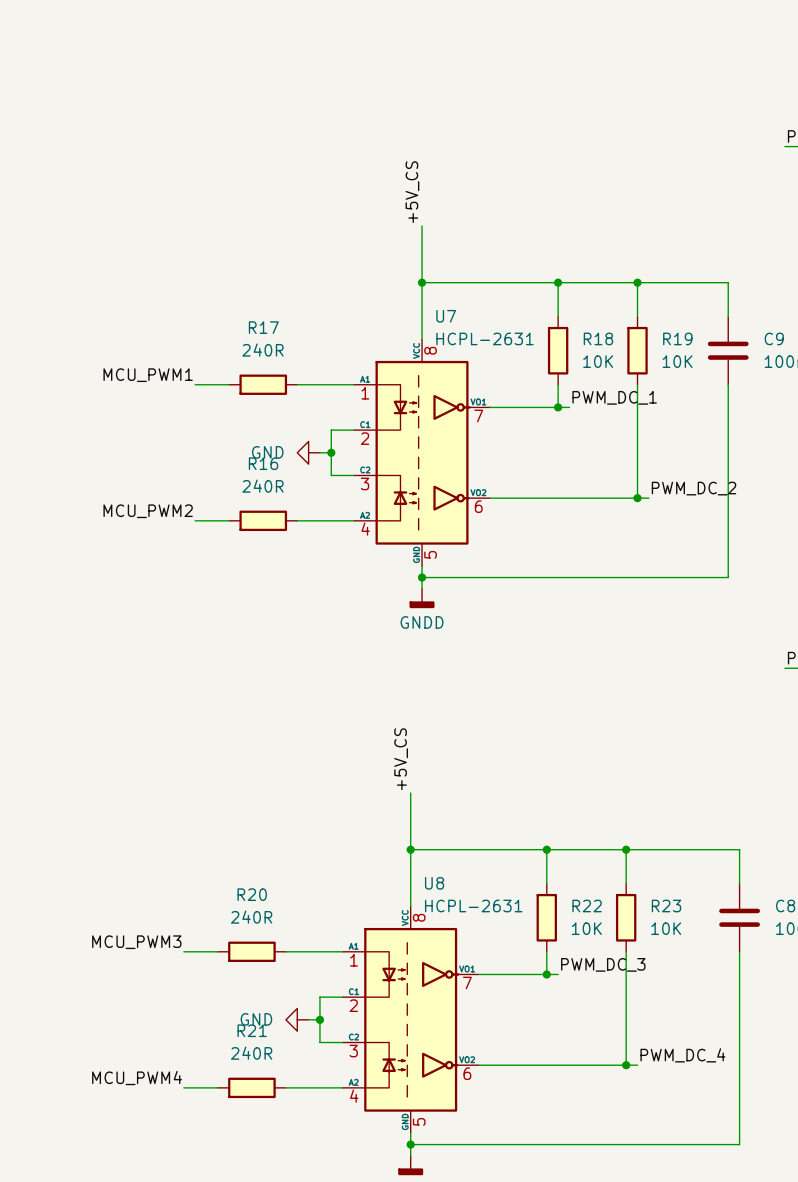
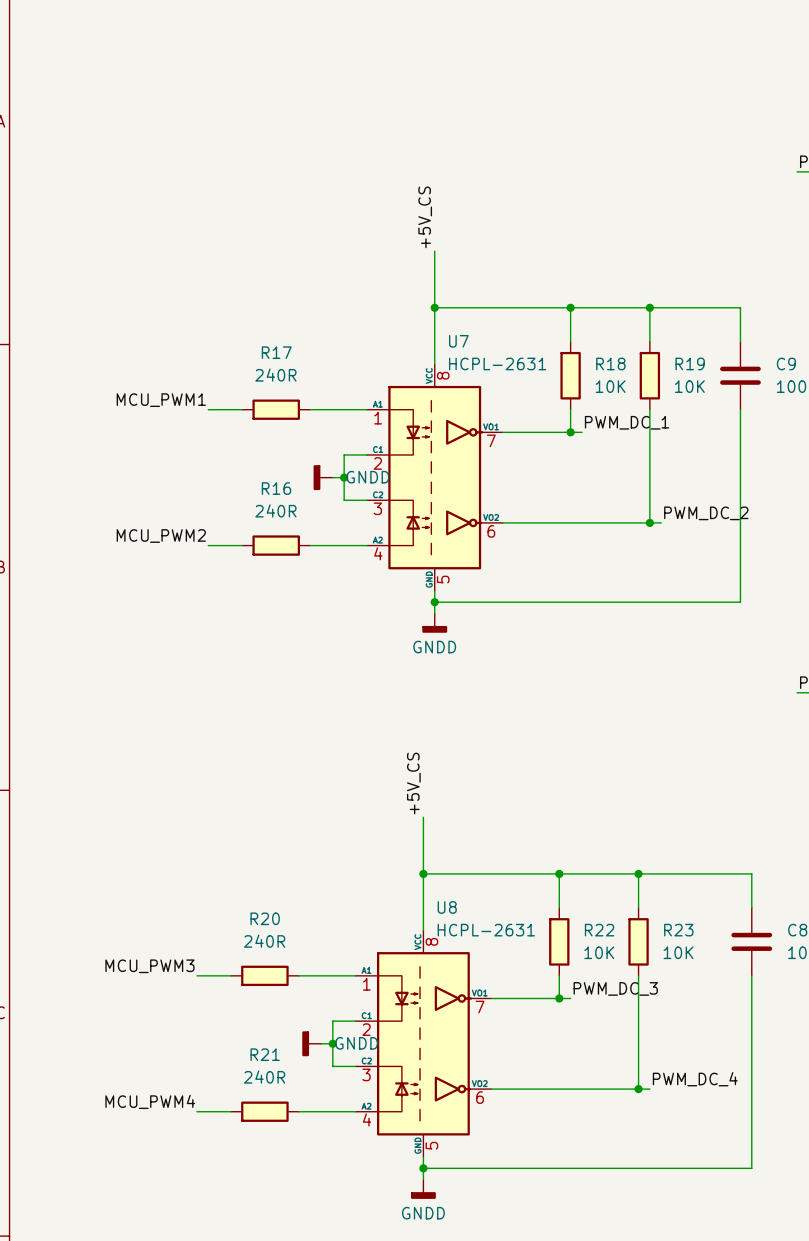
power symbol: GND (308, 452) -> GNDD (323, 477)
power symbol: GND (297, 1019) -> GNDD (311, 1043)

